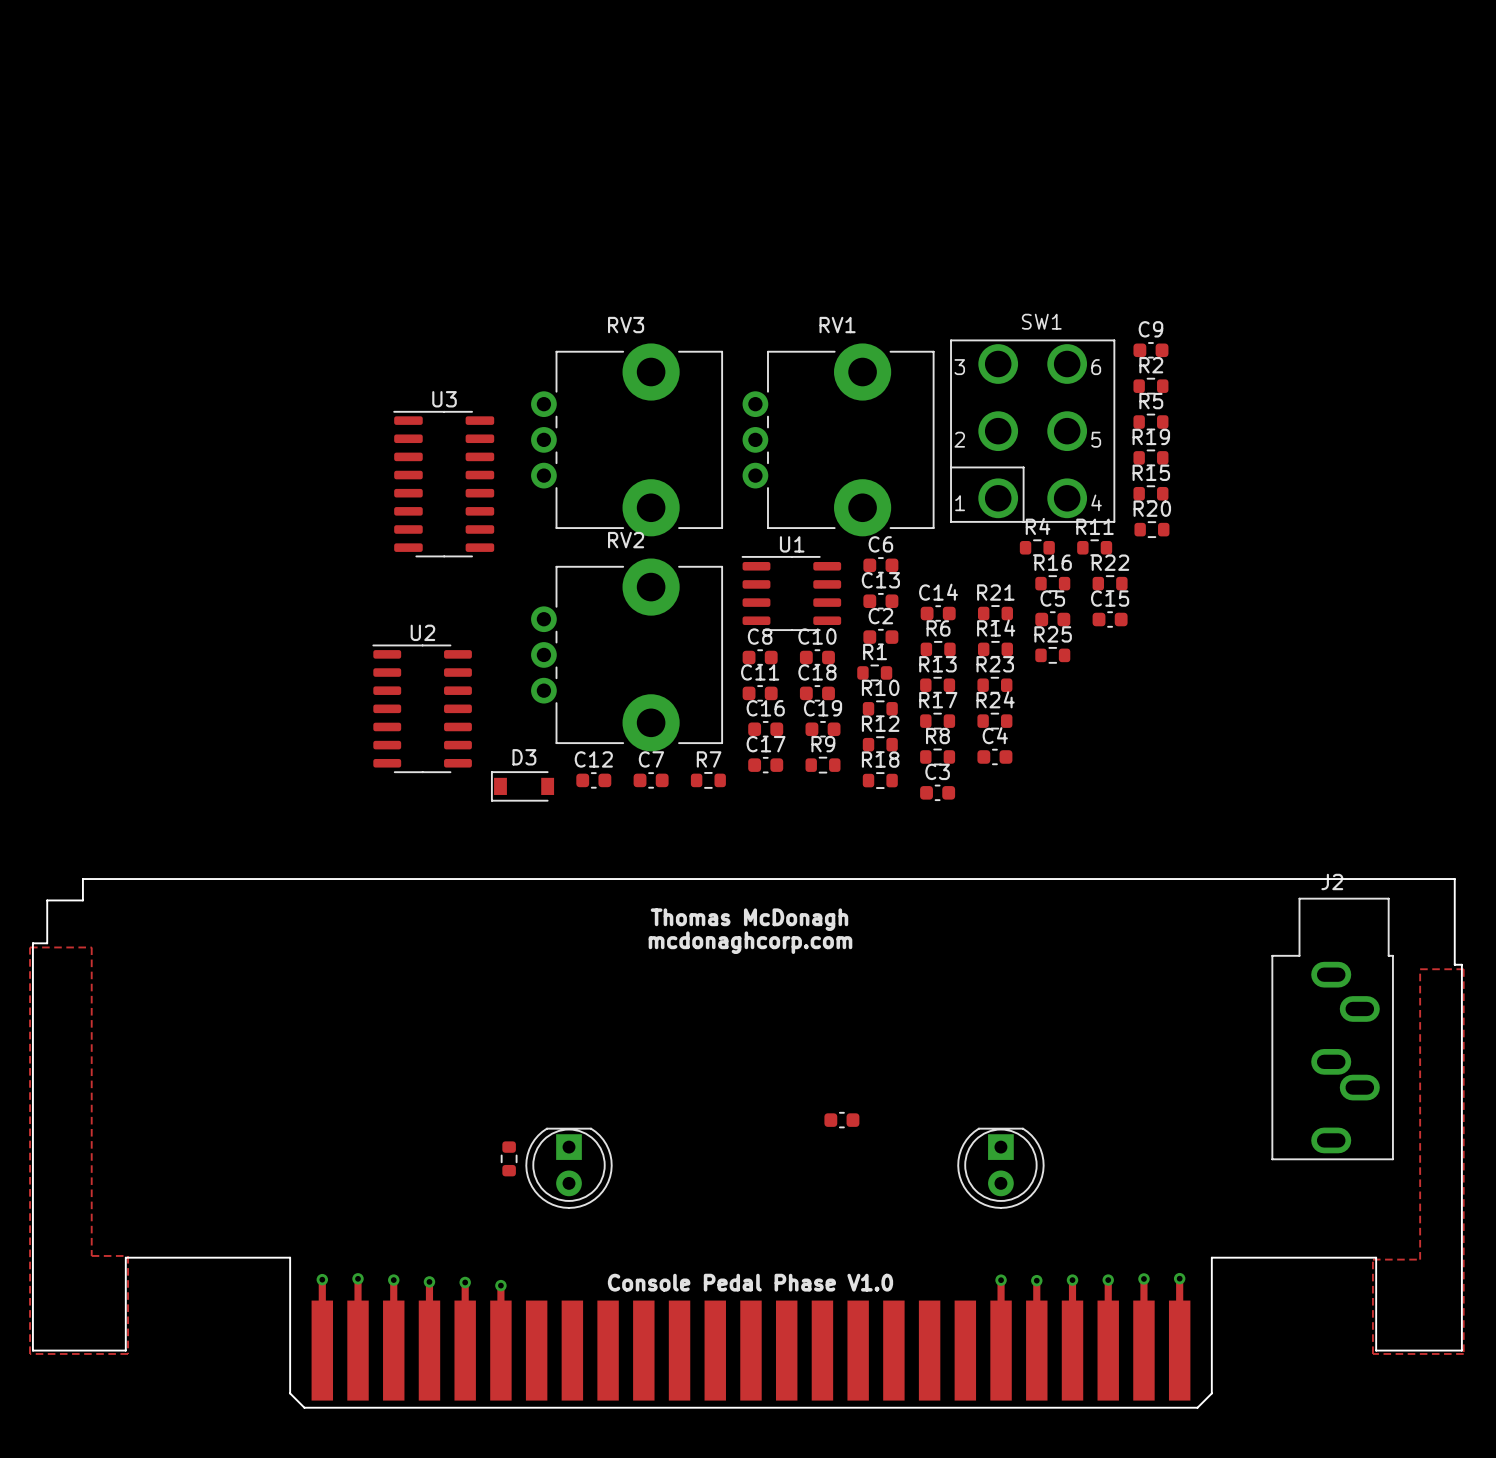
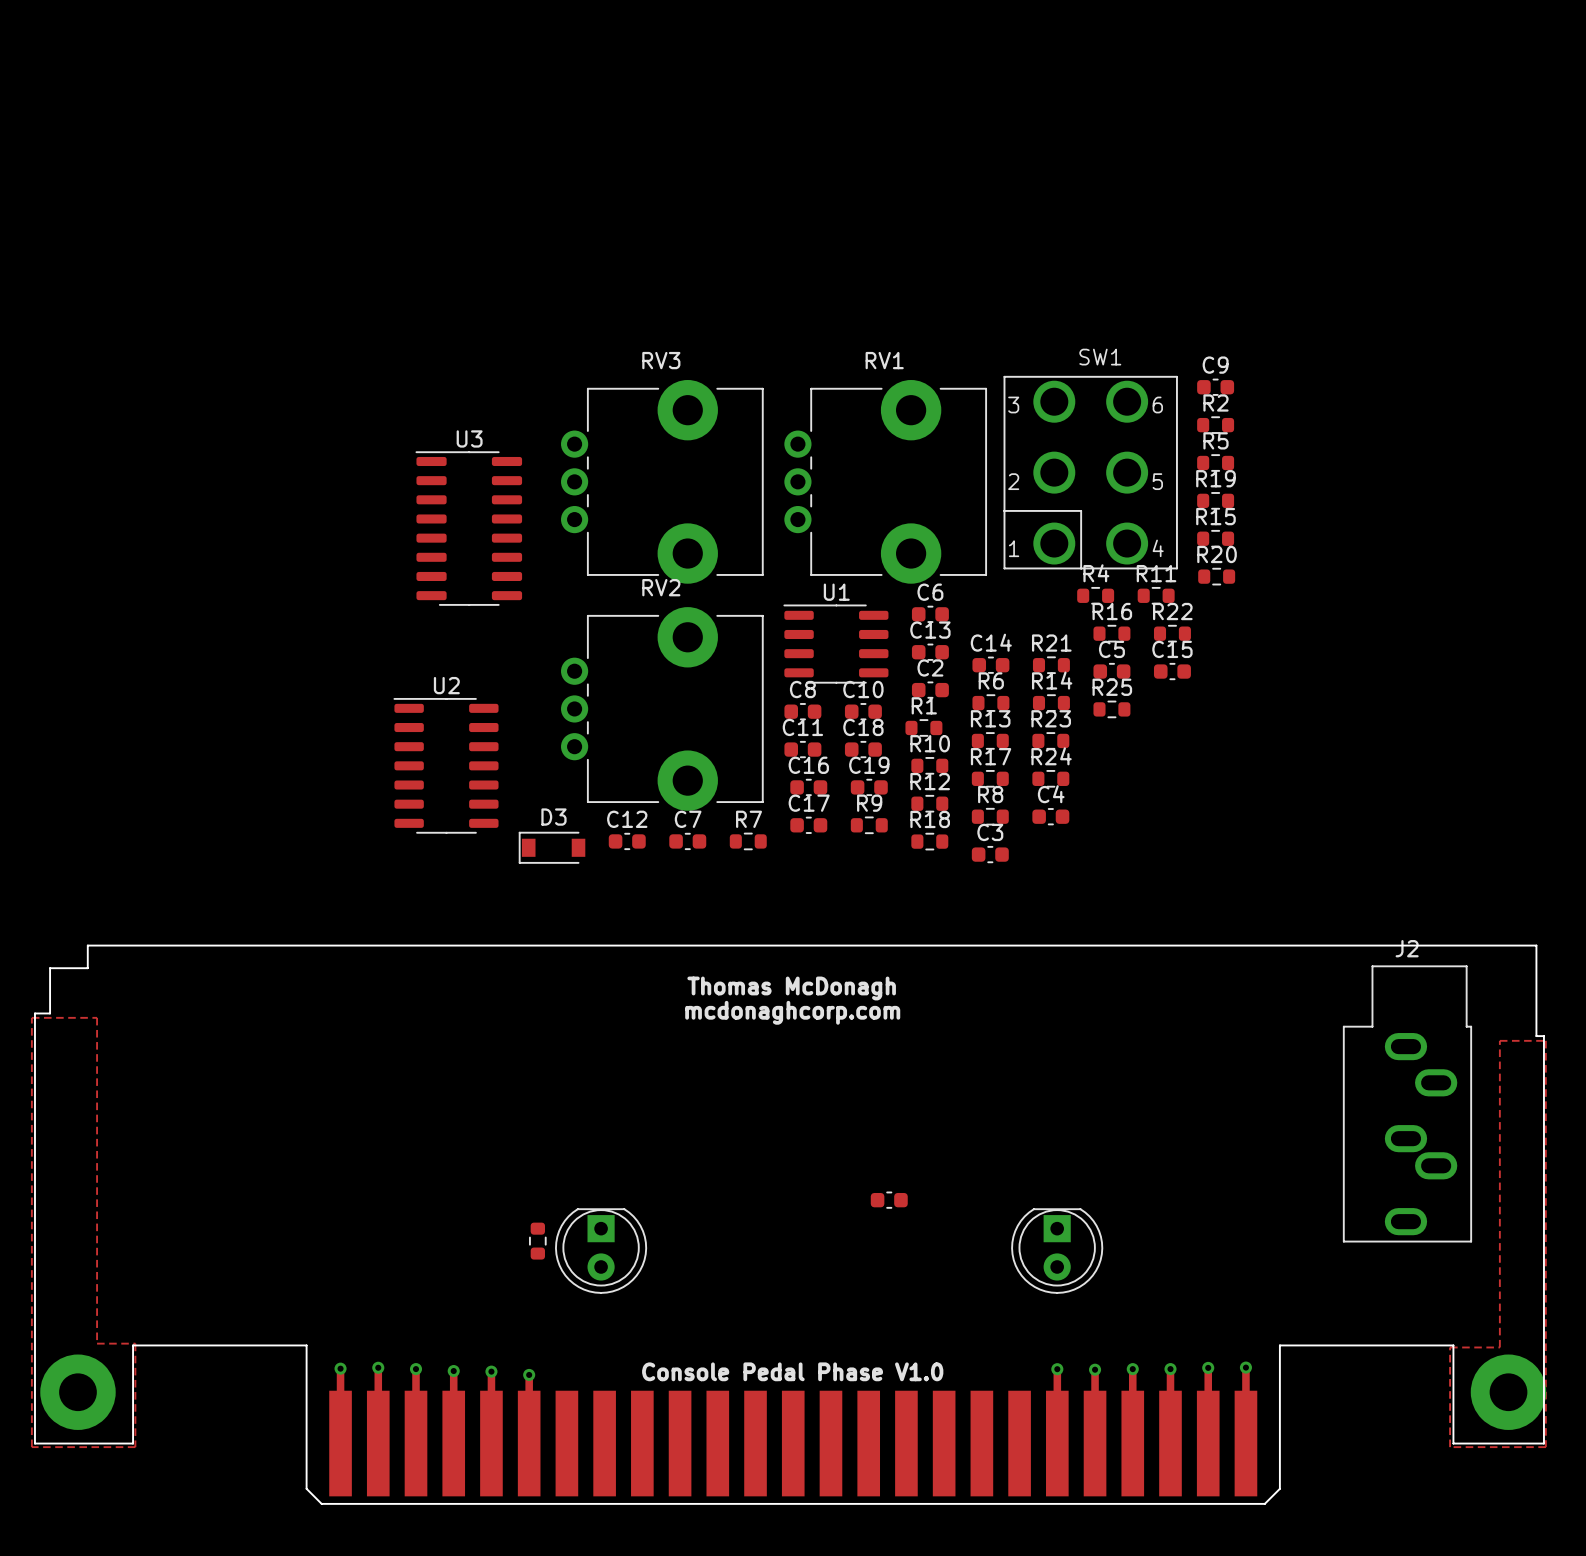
part: none -> (77, 1392)
part: none -> (1508, 1392)

